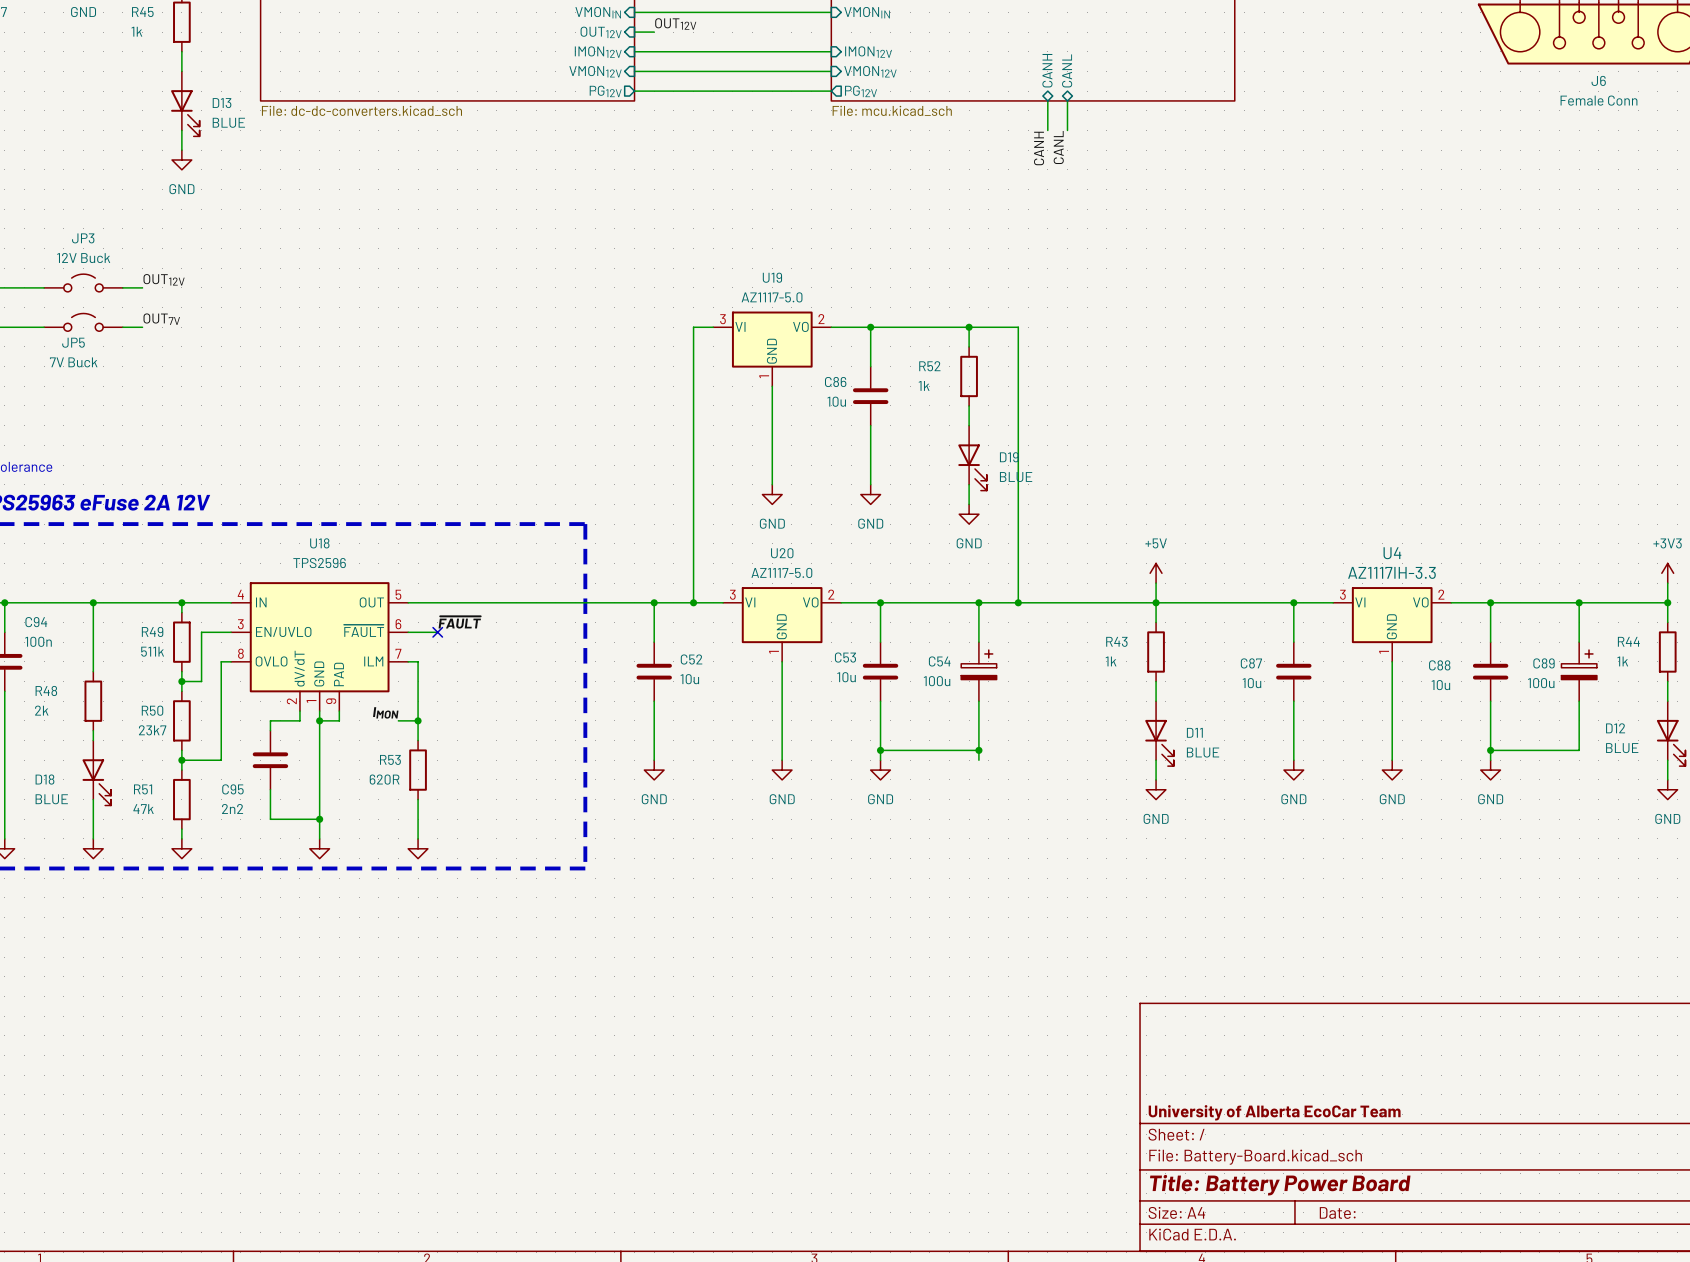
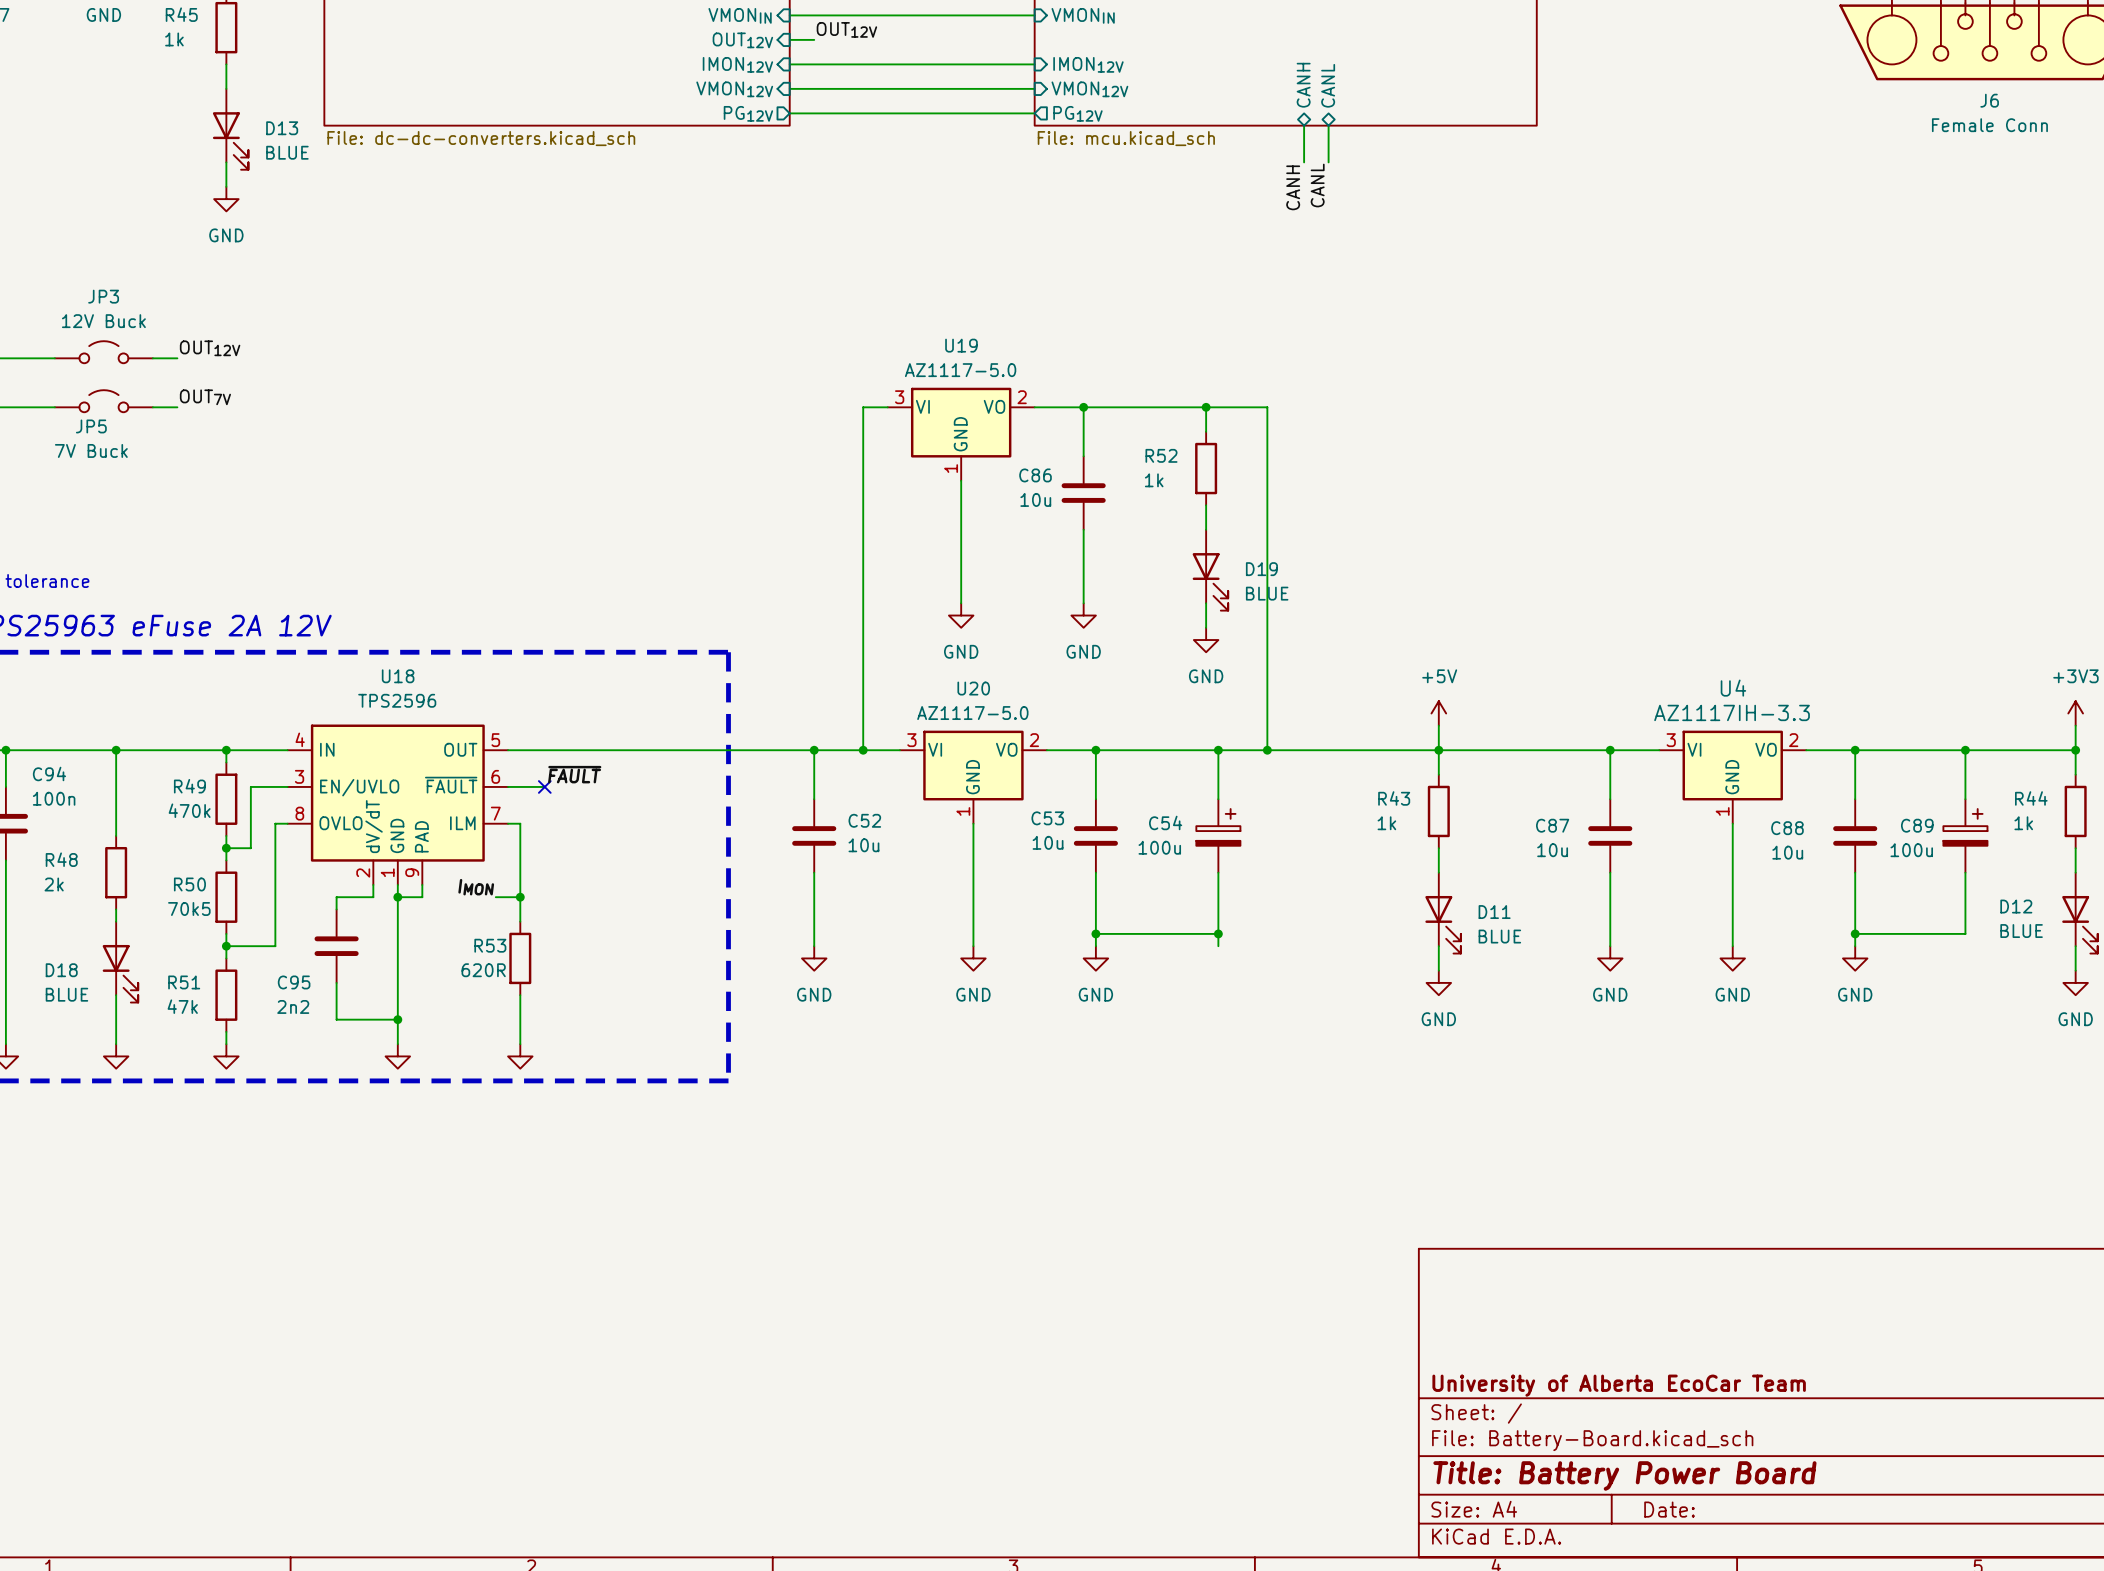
R49 value: 511k (152, 651) -> 470k (189, 810)
R50 value: 23k7 (152, 730) -> 70k5 (189, 908)

